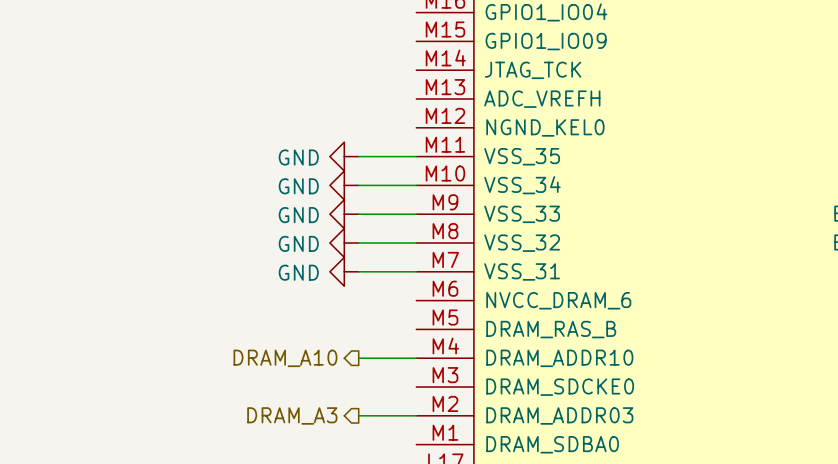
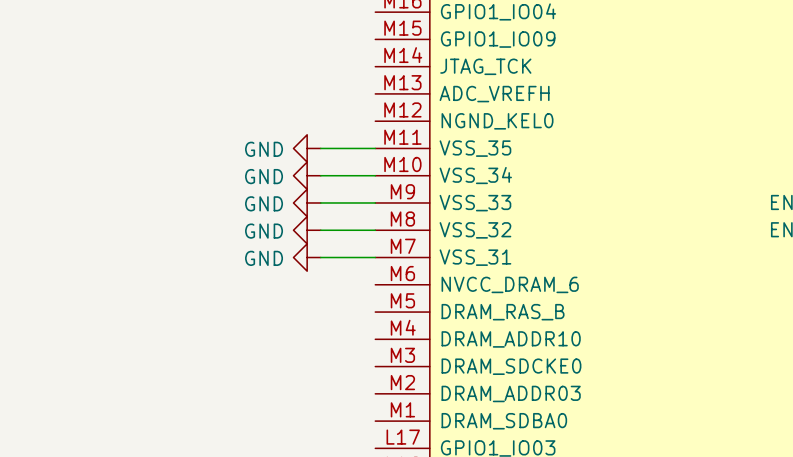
hierarchical label: DRAM_A10 (285, 358) -> none
wire: (358, 358) (416, 358) -> none
hierarchical label: DRAM_A3 (292, 415) -> none
wire: (358, 415) (416, 415) -> none

